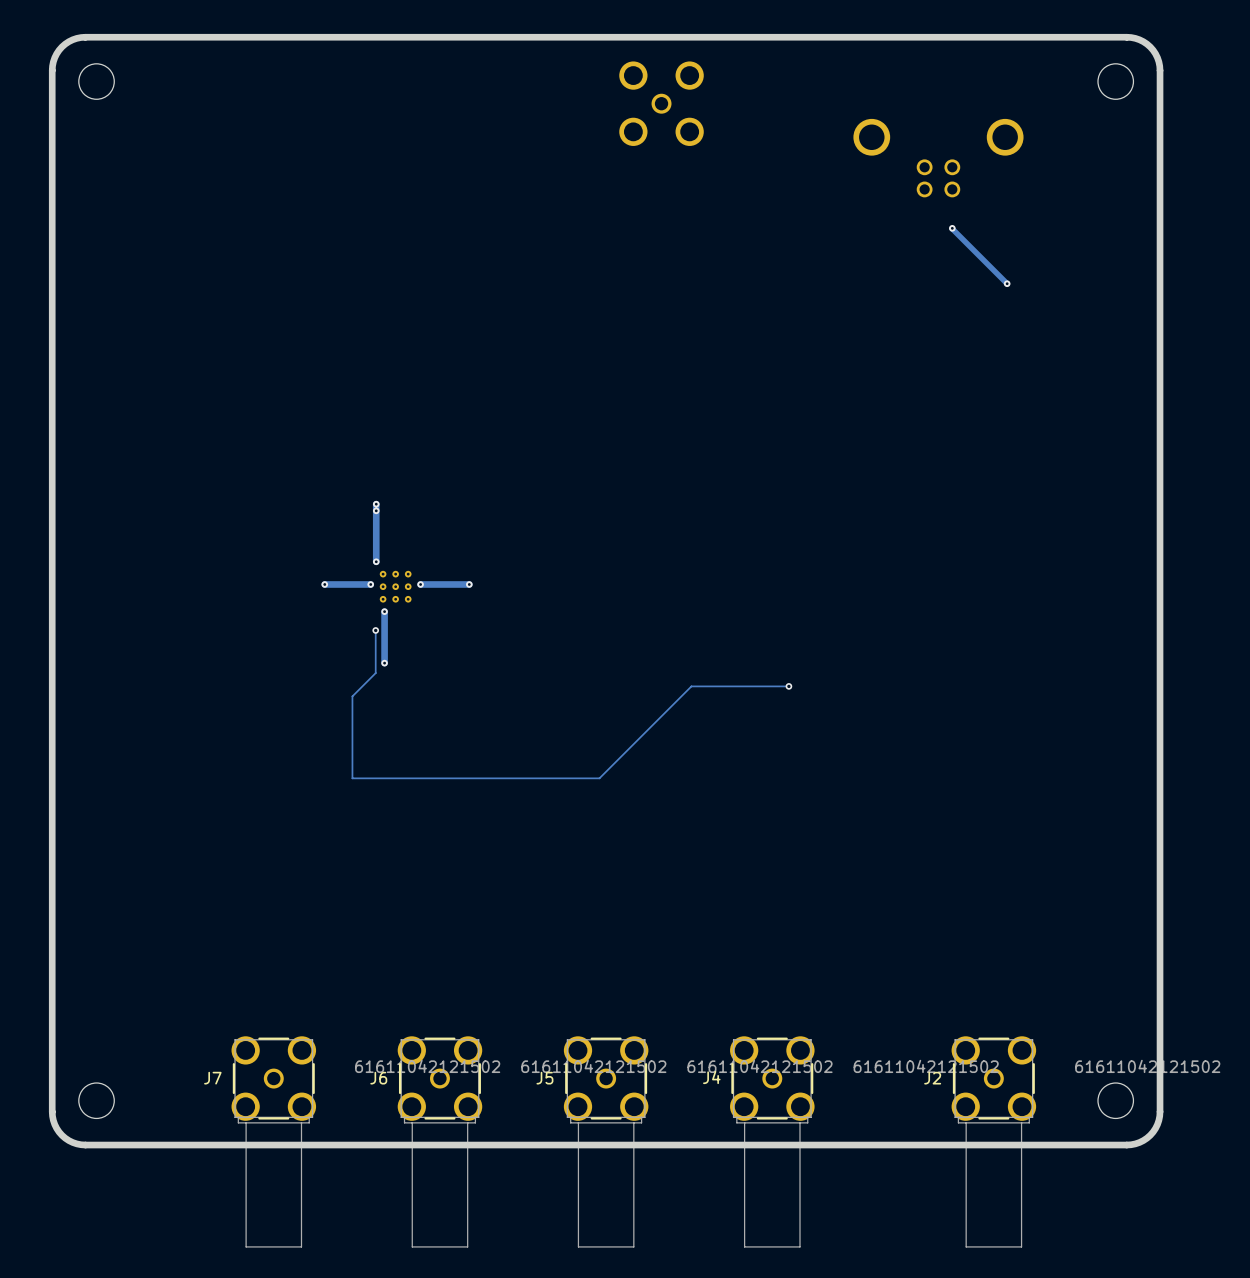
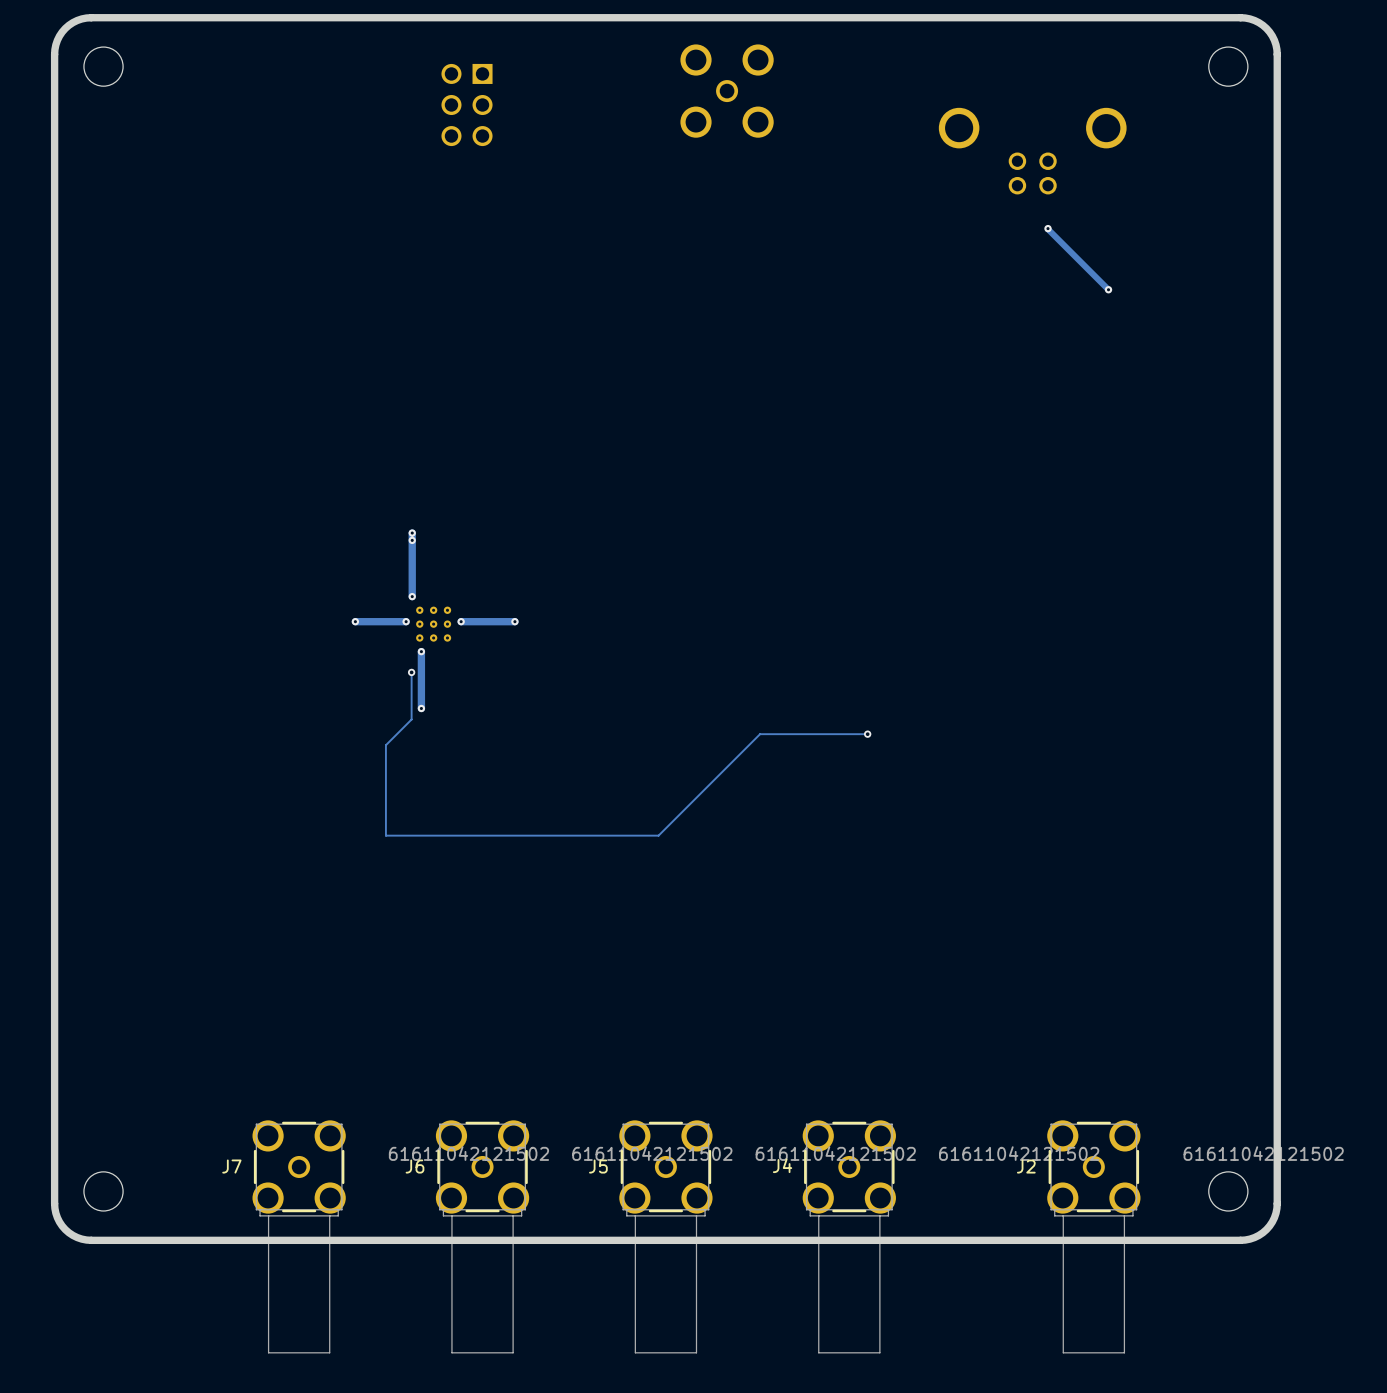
part: none -> (467, 105)

